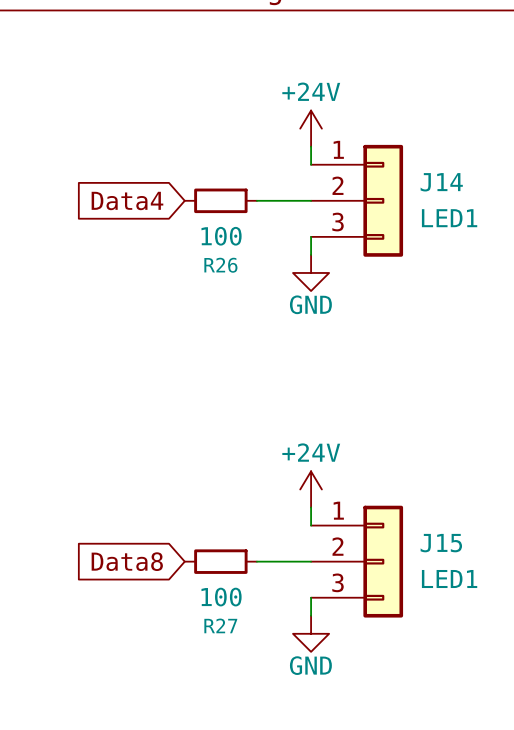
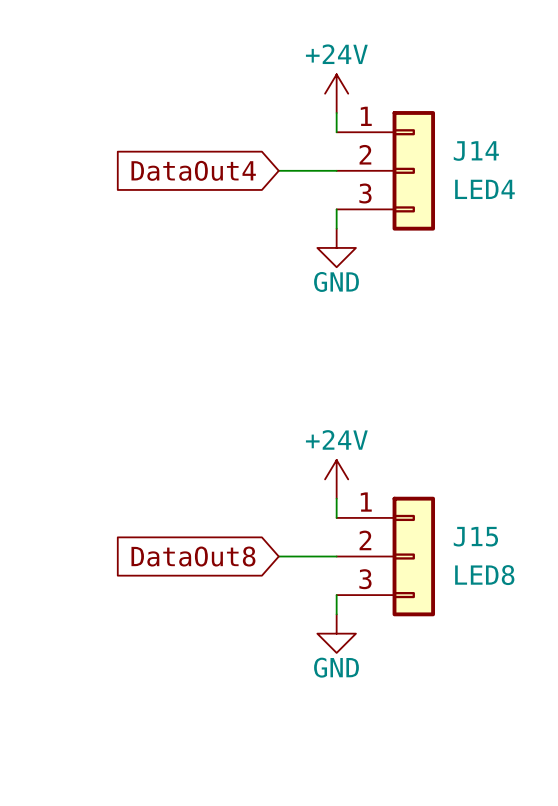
global label: Data4 (127, 200) -> DataOut4 (193, 170)
R26: 100 (220, 200) -> none
J14 value: LED1 (449, 218) -> LED4 (484, 189)
global label: Data8 (127, 561) -> DataOut8 (193, 556)
R27: 100 (220, 561) -> none
J15 value: LED1 (449, 579) -> LED8 (484, 575)

